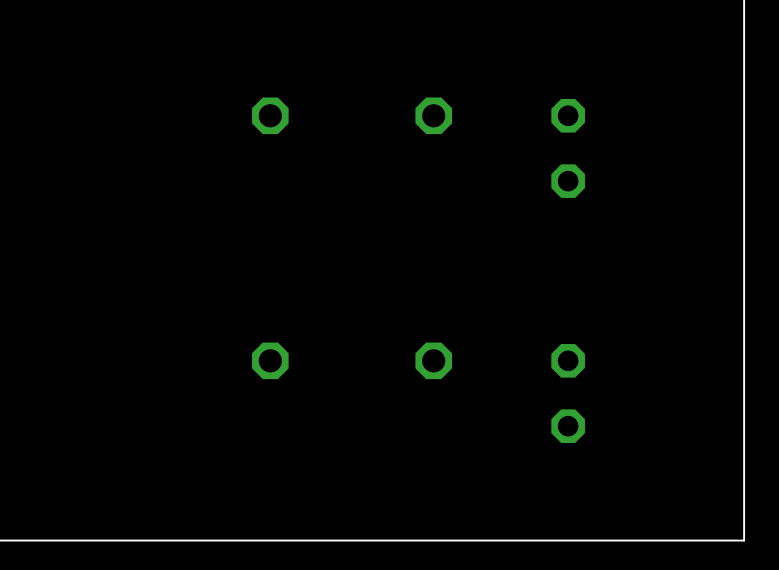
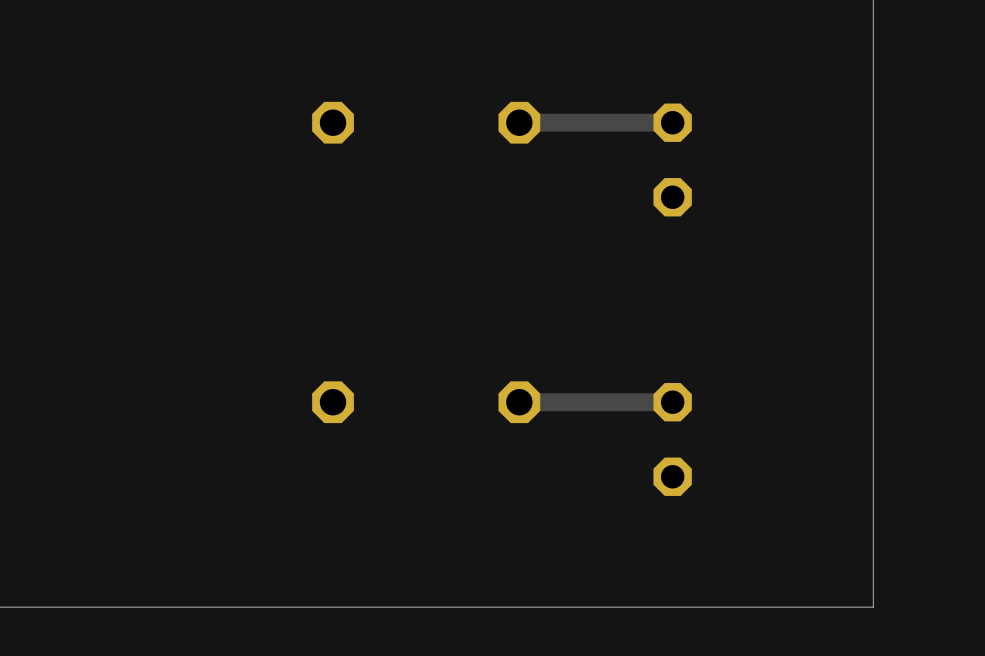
track: none -> (672, 122) (519, 122)
track: none -> (672, 402) (519, 402)

